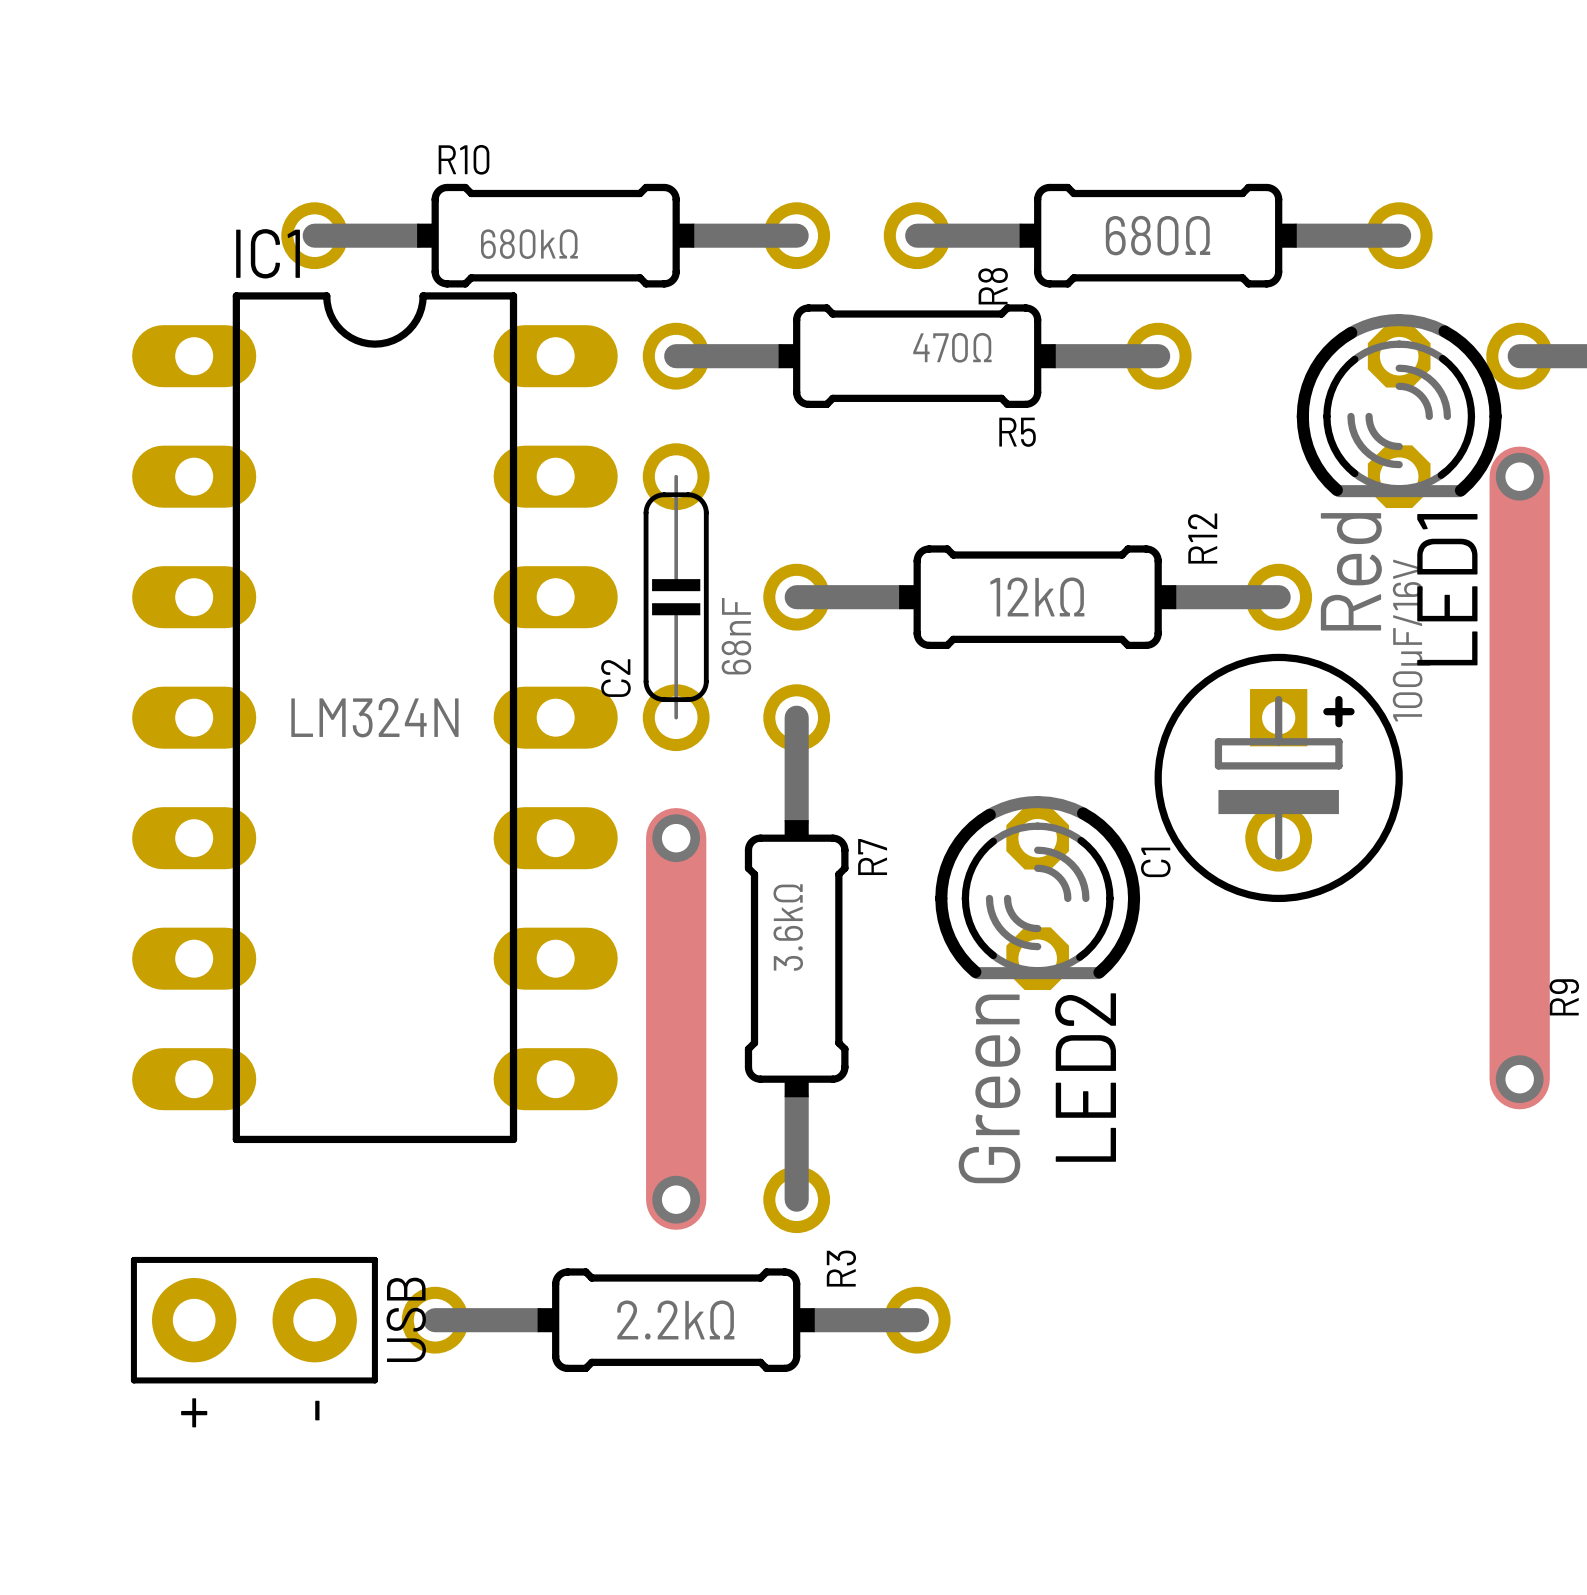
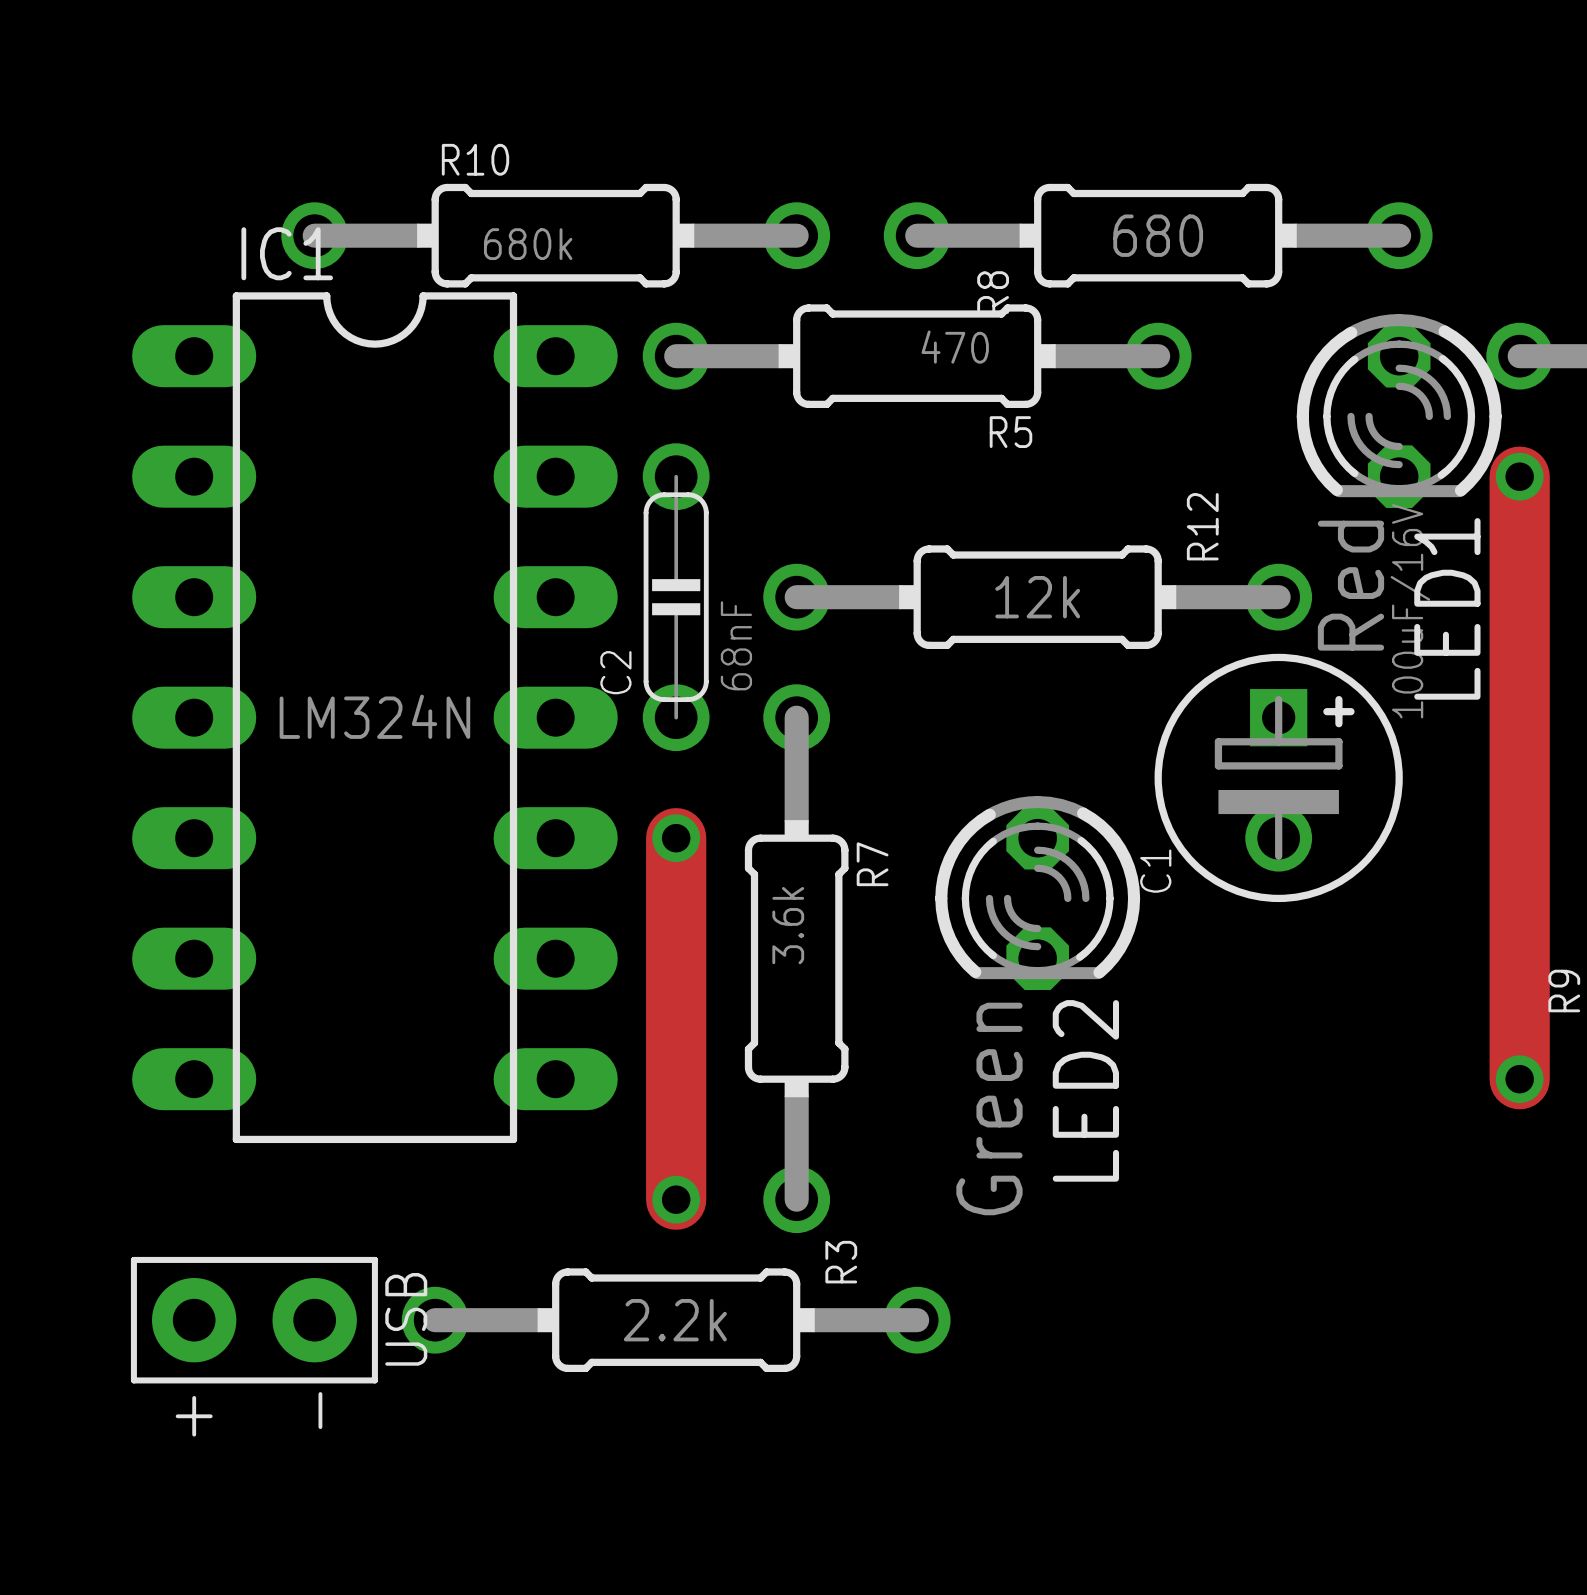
R8 value: 680Ω (1158, 235) -> 680 (1158, 235)
R10 value: 680kΩ (529, 244) -> 680k (528, 244)
R5 value: 470Ω (952, 347) -> 470 (955, 347)
R12 value: 12kΩ (1037, 596) -> 12k (1037, 597)
C1 value: 100μF/16V (1411, 640) -> 100uF/16V (1410, 611)
R7 value: 3.6kΩ (788, 927) -> 3.6k (788, 925)
R3 value: 2.2kΩ (675, 1320) -> 2.2k (675, 1320)

